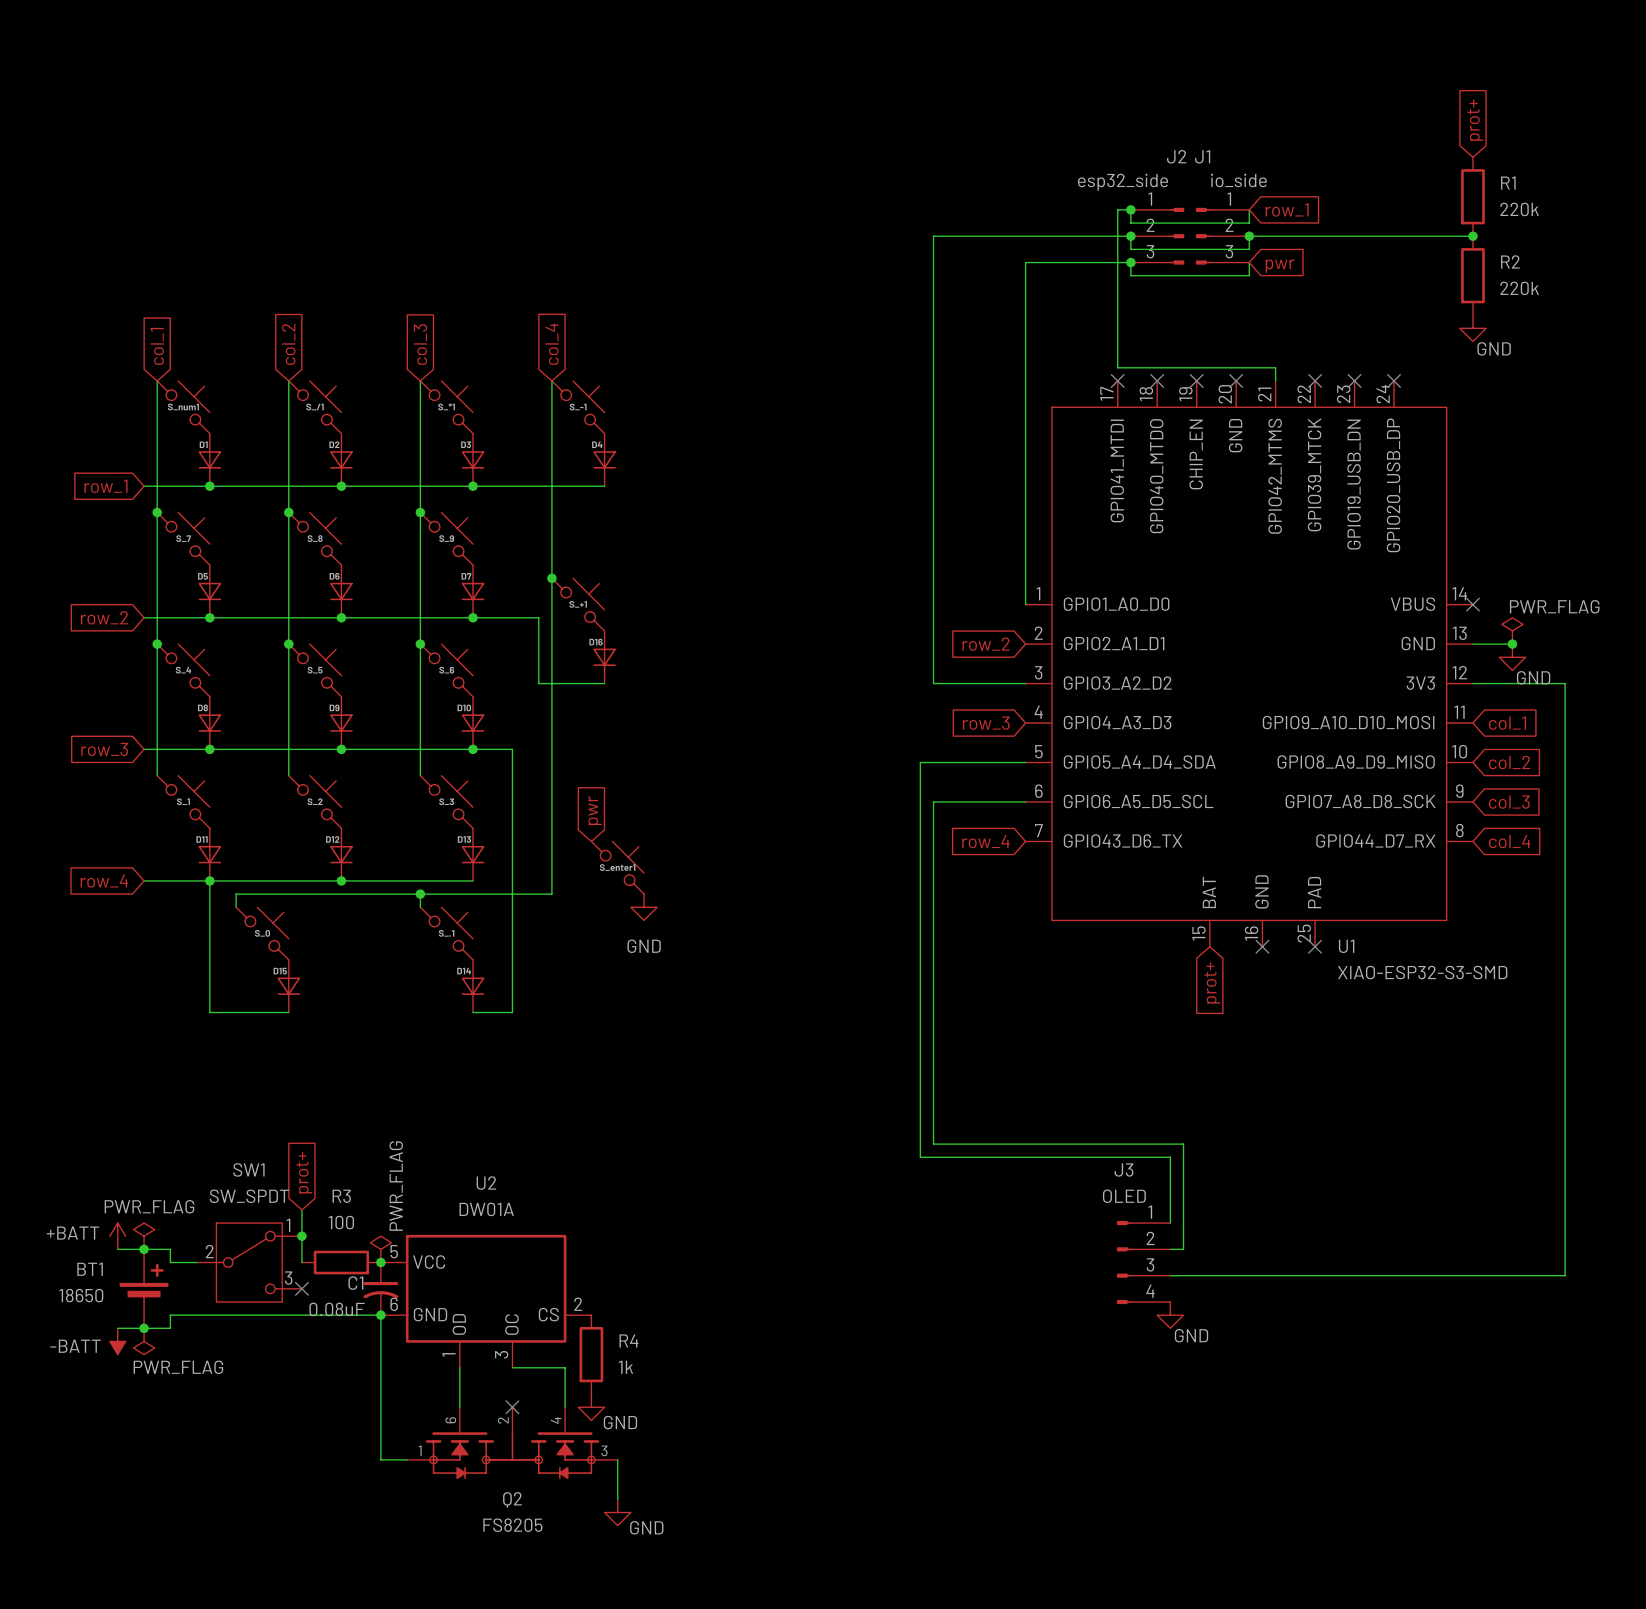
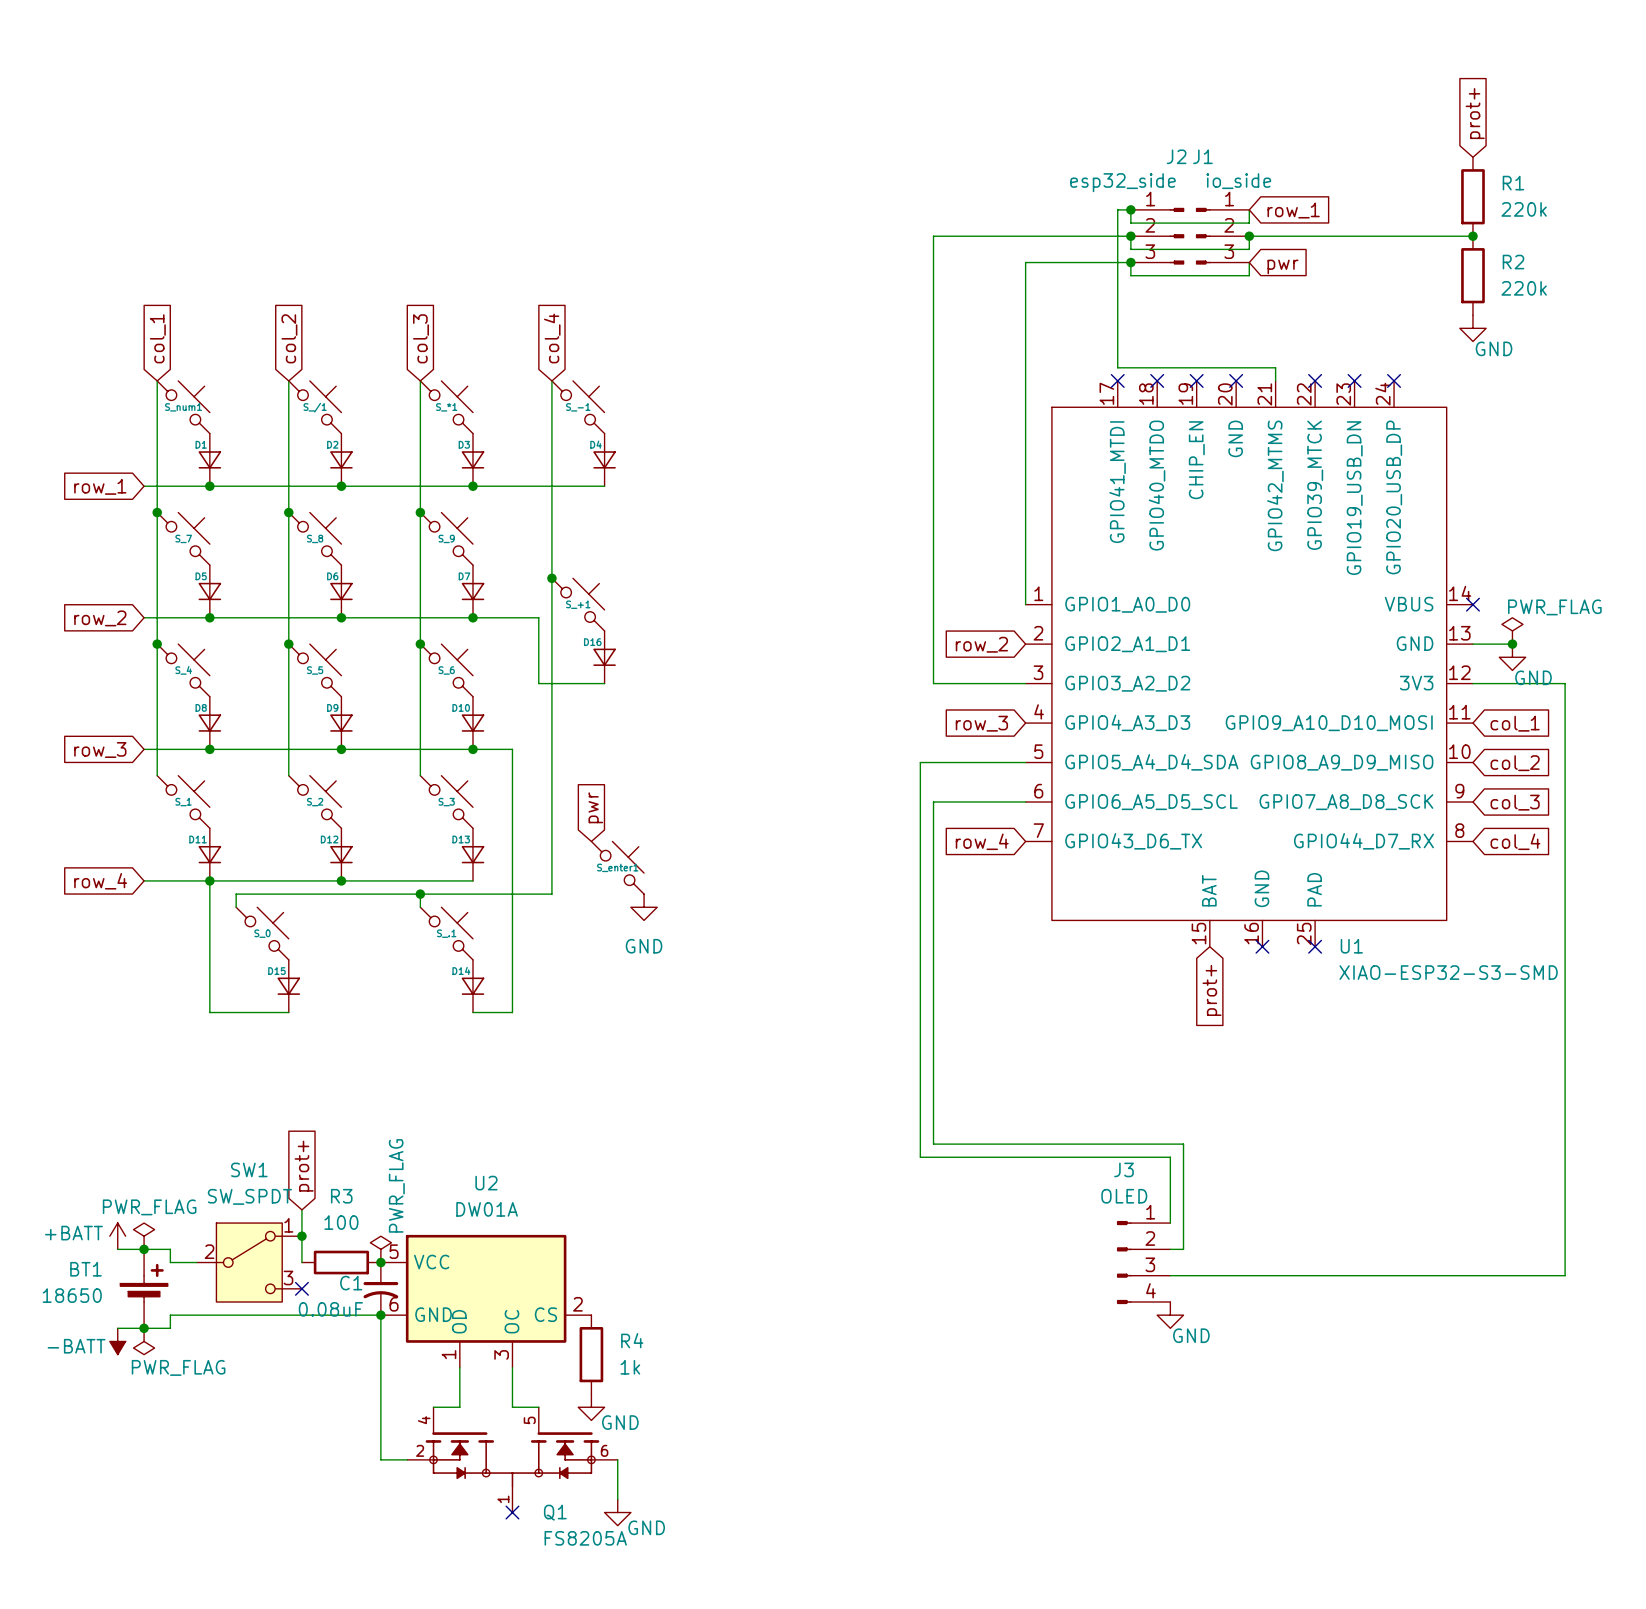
wire: (512, 1367) (565, 1367) (565, 1407) -> (512, 1367) (512, 1407) (538, 1407)
wire: none -> (433, 1407) (459, 1407)
no-connect mark: (512, 1407) -> none
Q2: FS8205 (512, 1443) -> none
Q1: none -> FS8205A (512, 1459)
no-connect mark: none -> (512, 1512)

